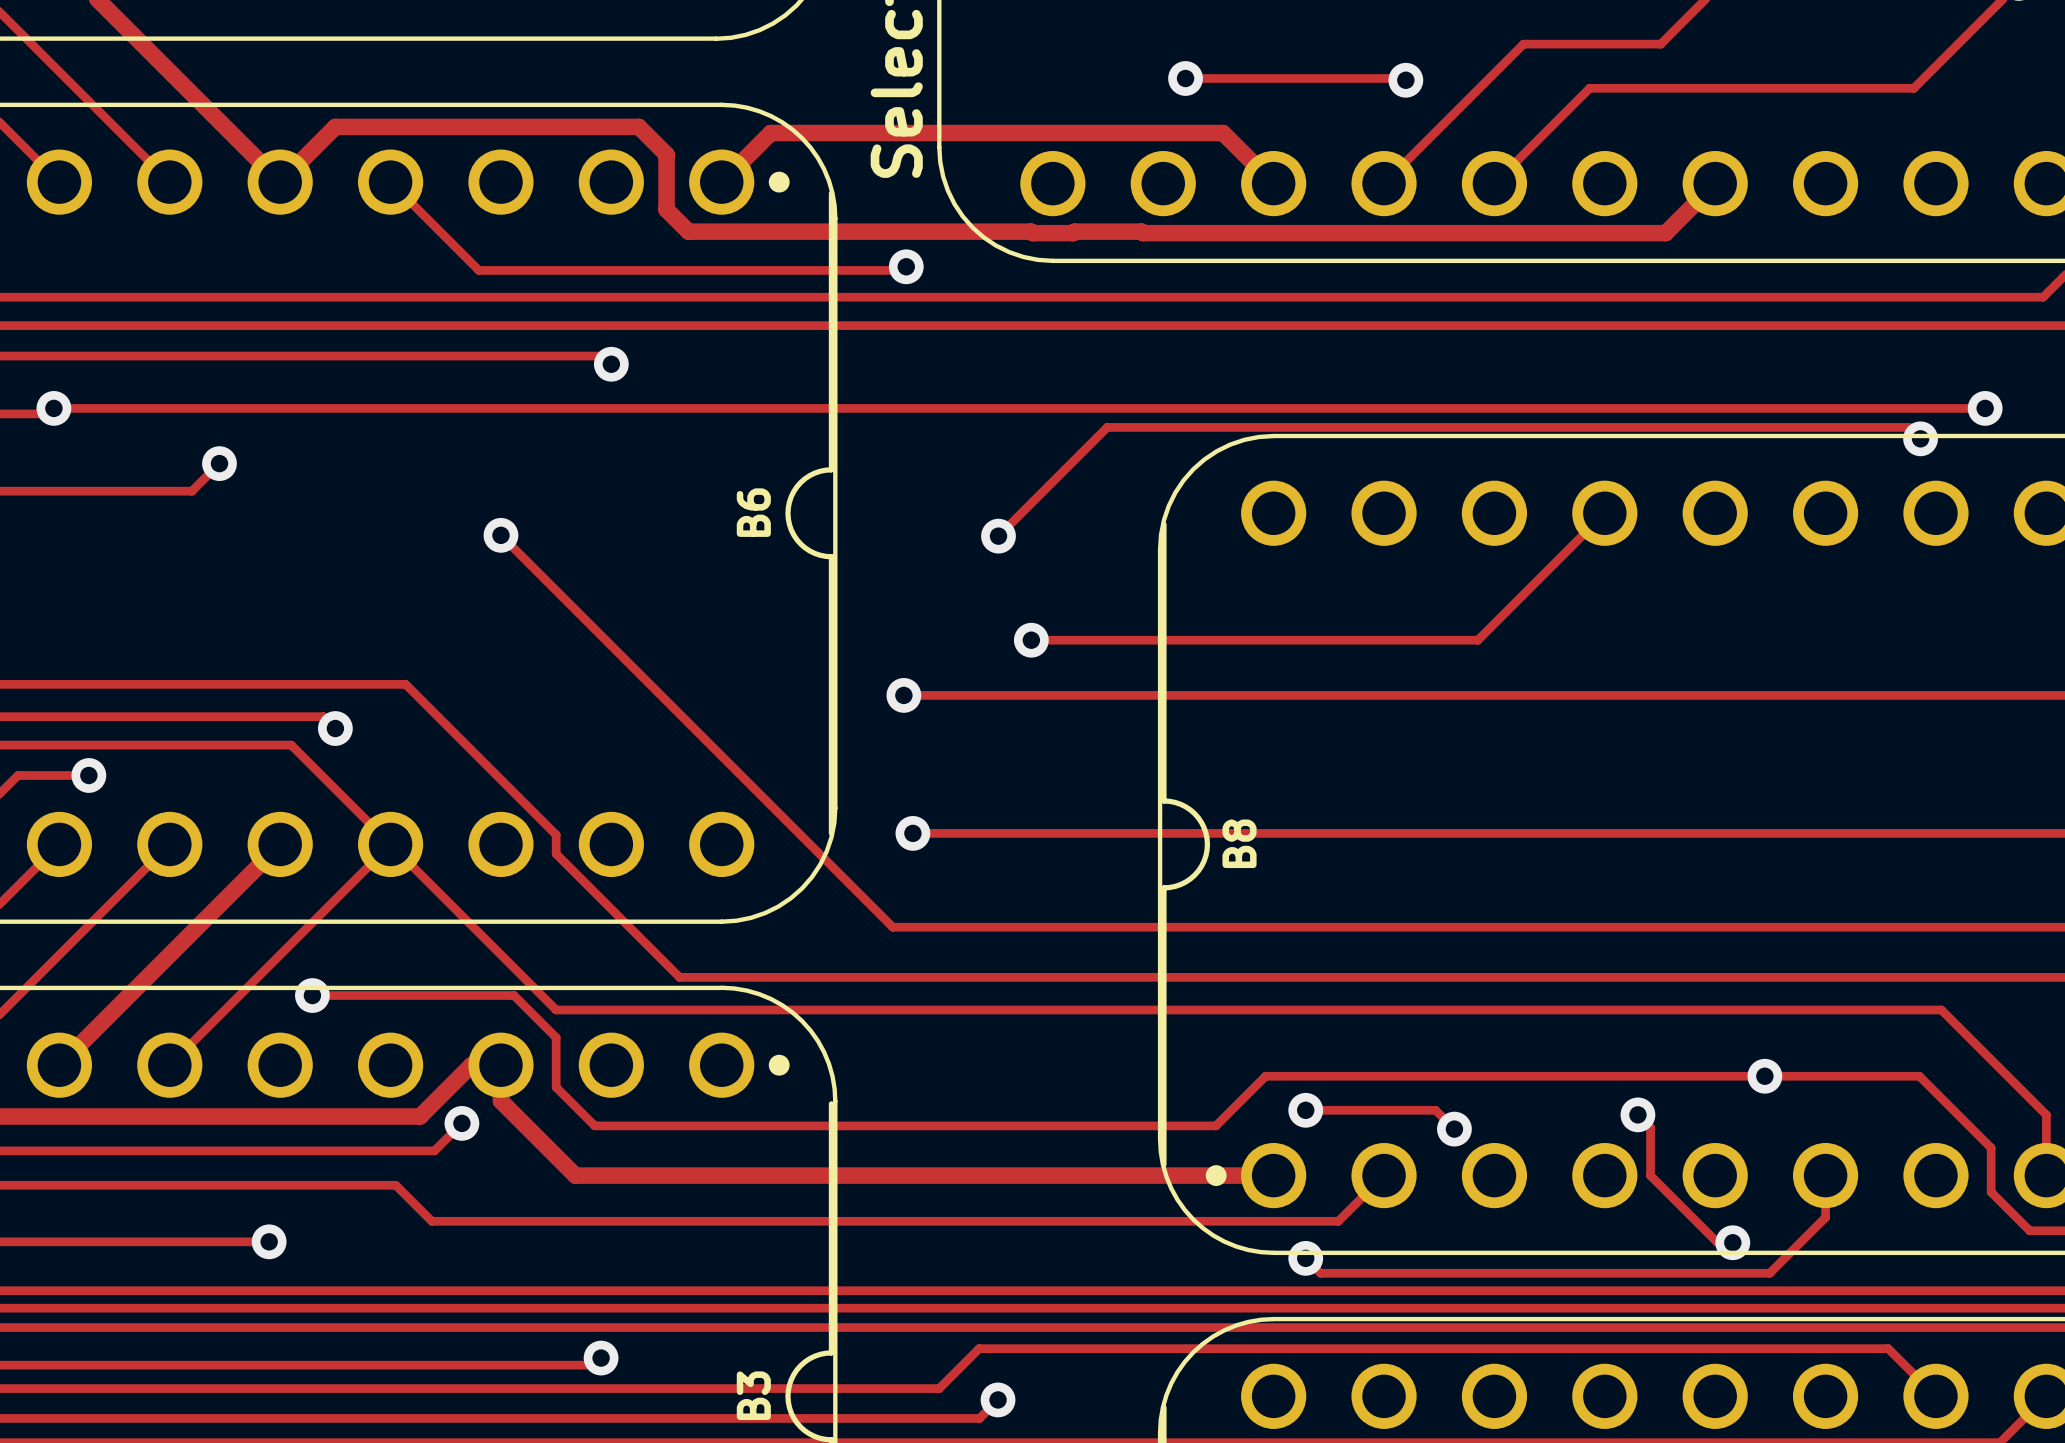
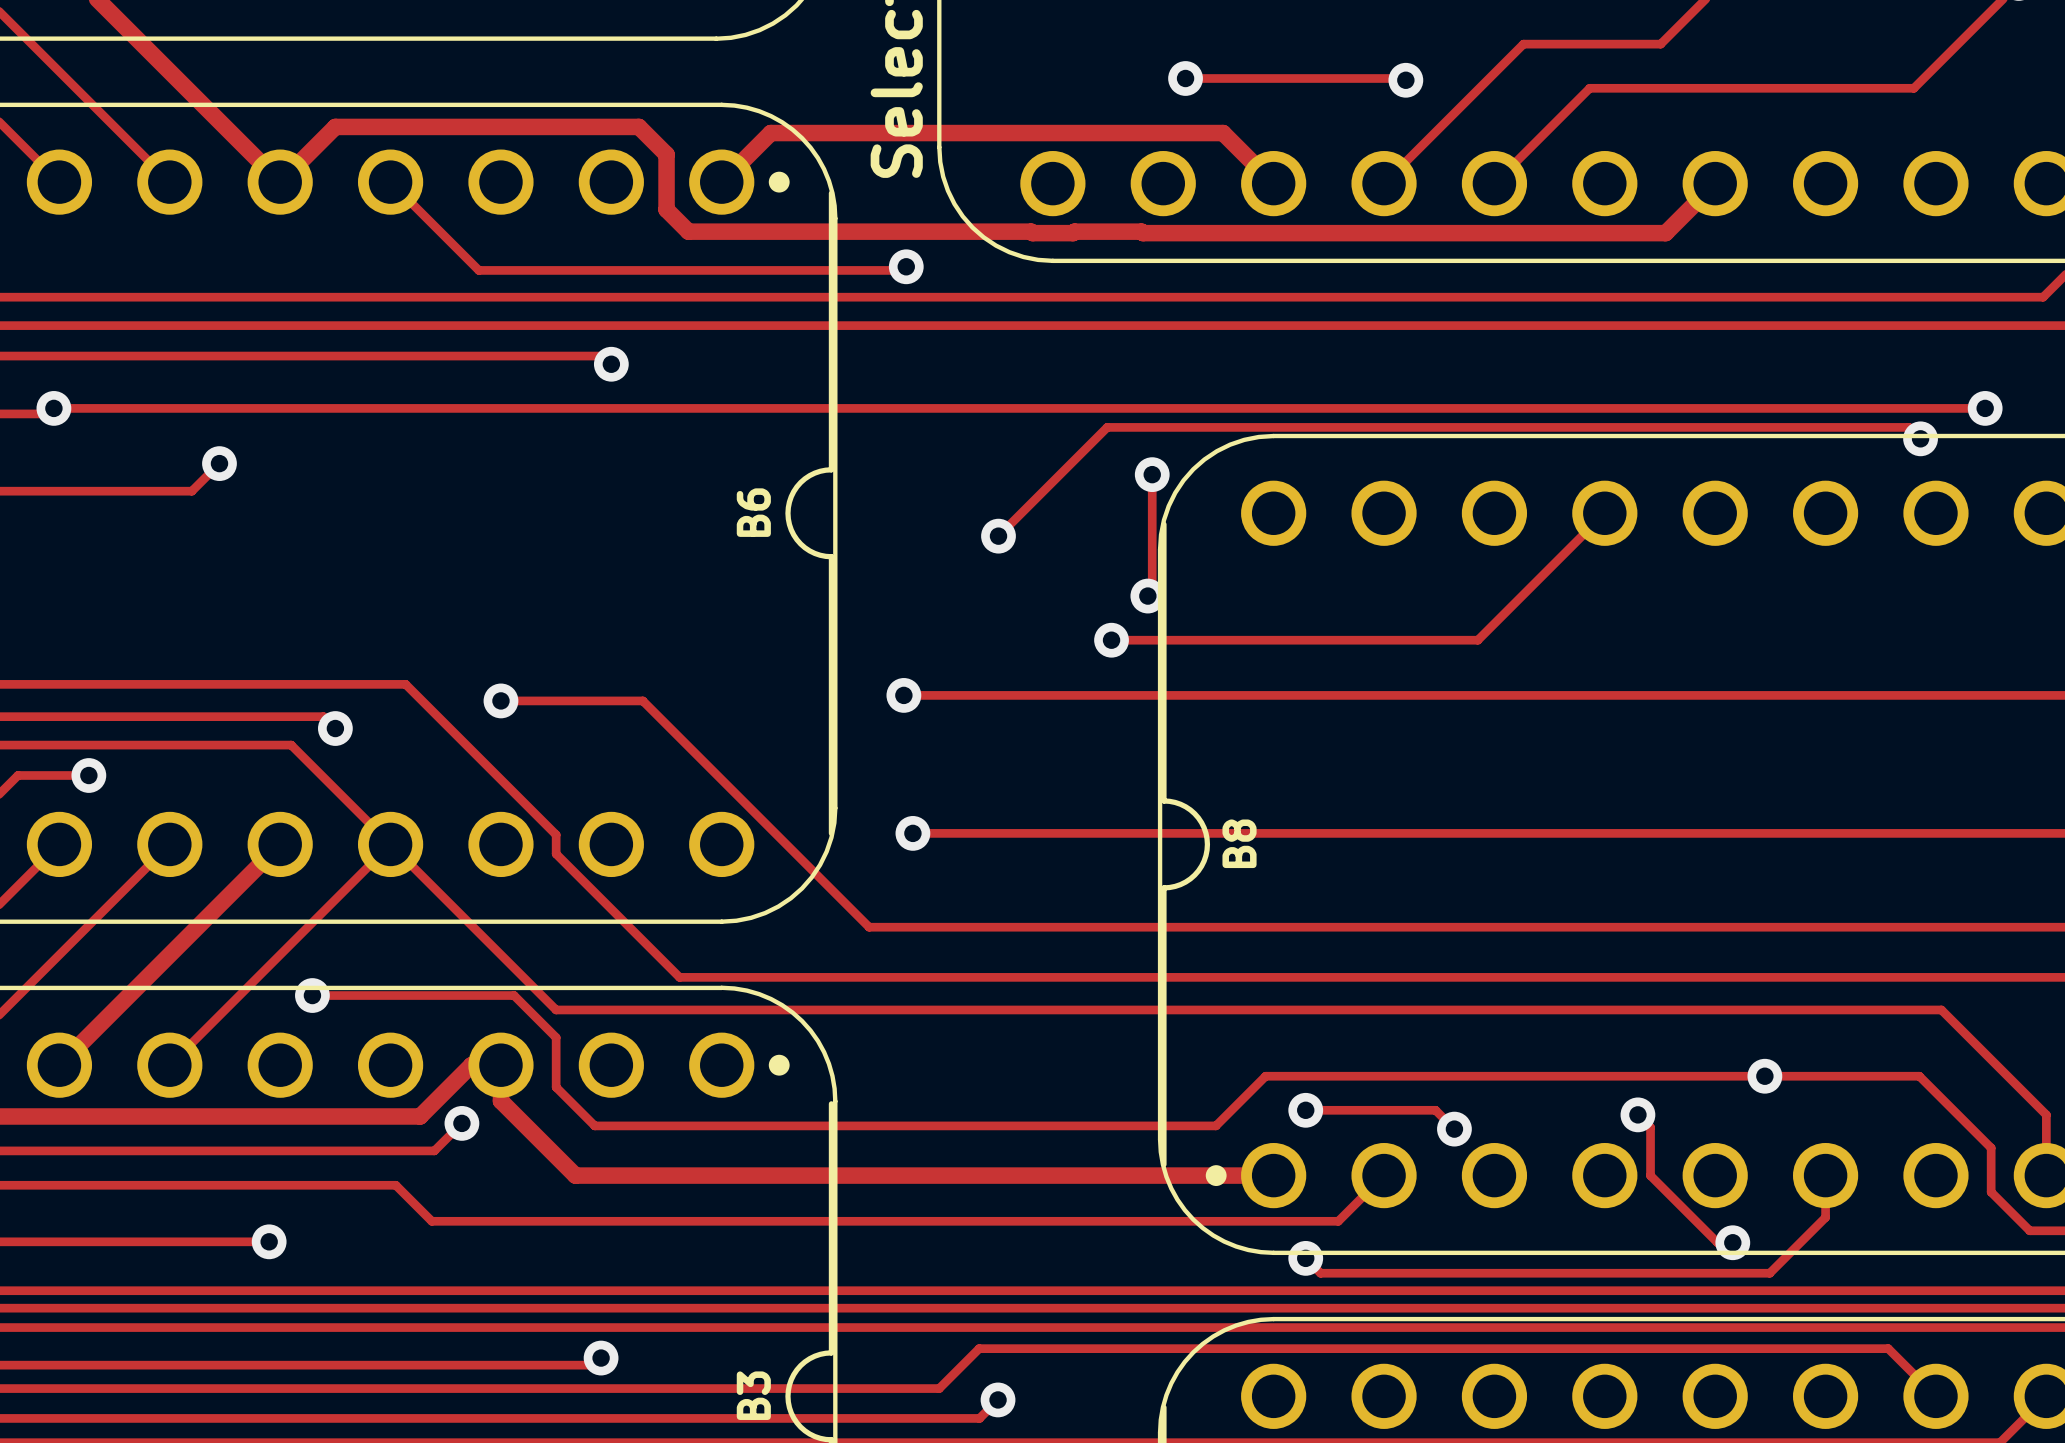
track: none -> (1152, 474) (1152, 591) (1147, 596)
via: none -> (1152, 474)
track: (500, 535) (892, 927) -> (500, 700) (642, 700) (869, 927) (892, 927)
via position: (500, 535) -> (500, 700)
via: none -> (1147, 596)
track: (1031, 640) (1111, 640) -> none
via: (1031, 640) -> none
via: none -> (1111, 640)

